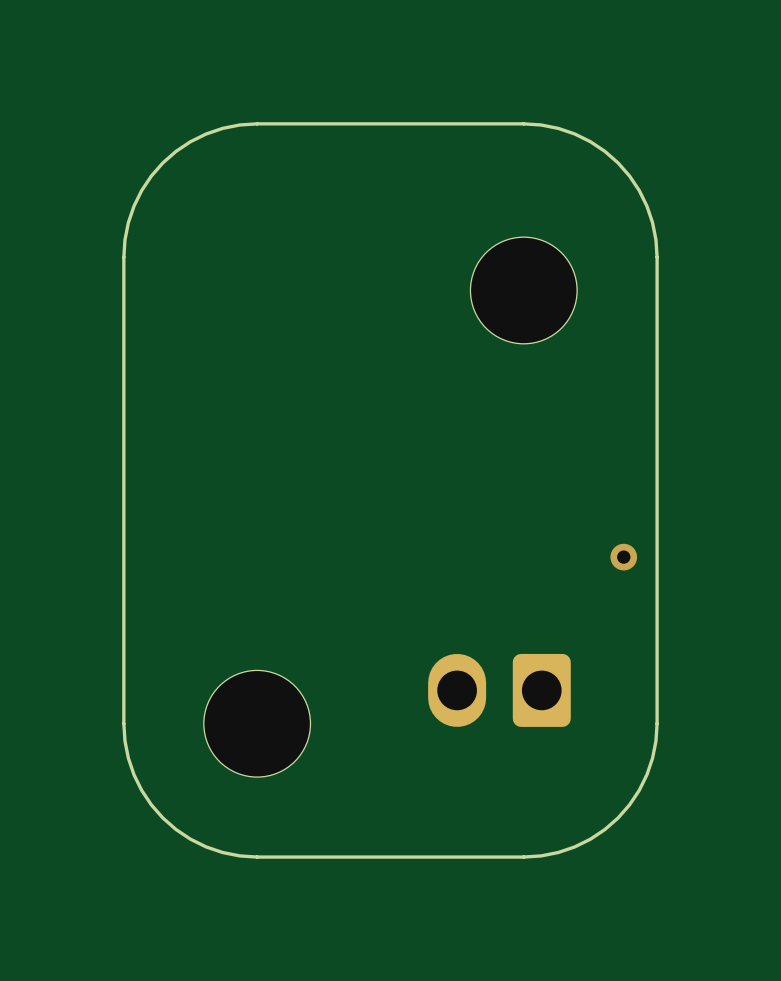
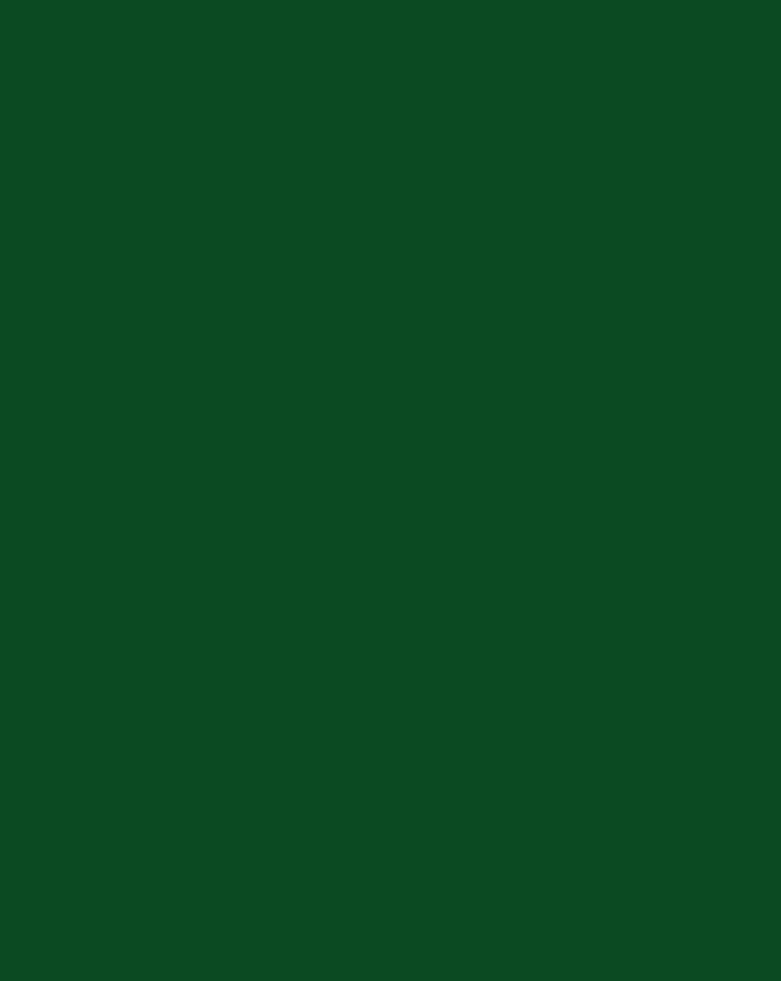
board edge: (523, 123) (257, 123) (222, 128) (190, 141) (176, 151) (151, 176) (134, 206) (128, 222) (123, 257) (124, 741) (134, 774) (151, 804) (176, 829) (206, 846) (222, 852) (257, 857) (541, 855) (574, 846) (604, 829) (629, 804) (646, 774) (655, 741) (657, 723) (655, 239) (646, 206) (639, 190) (629, 176) (604, 151) (574, 134) (558, 128) (523, 123) -> none
part: (523, 290) -> none
via: (623, 557) -> none
part: (499, 690) -> none
part: (257, 723) -> none

